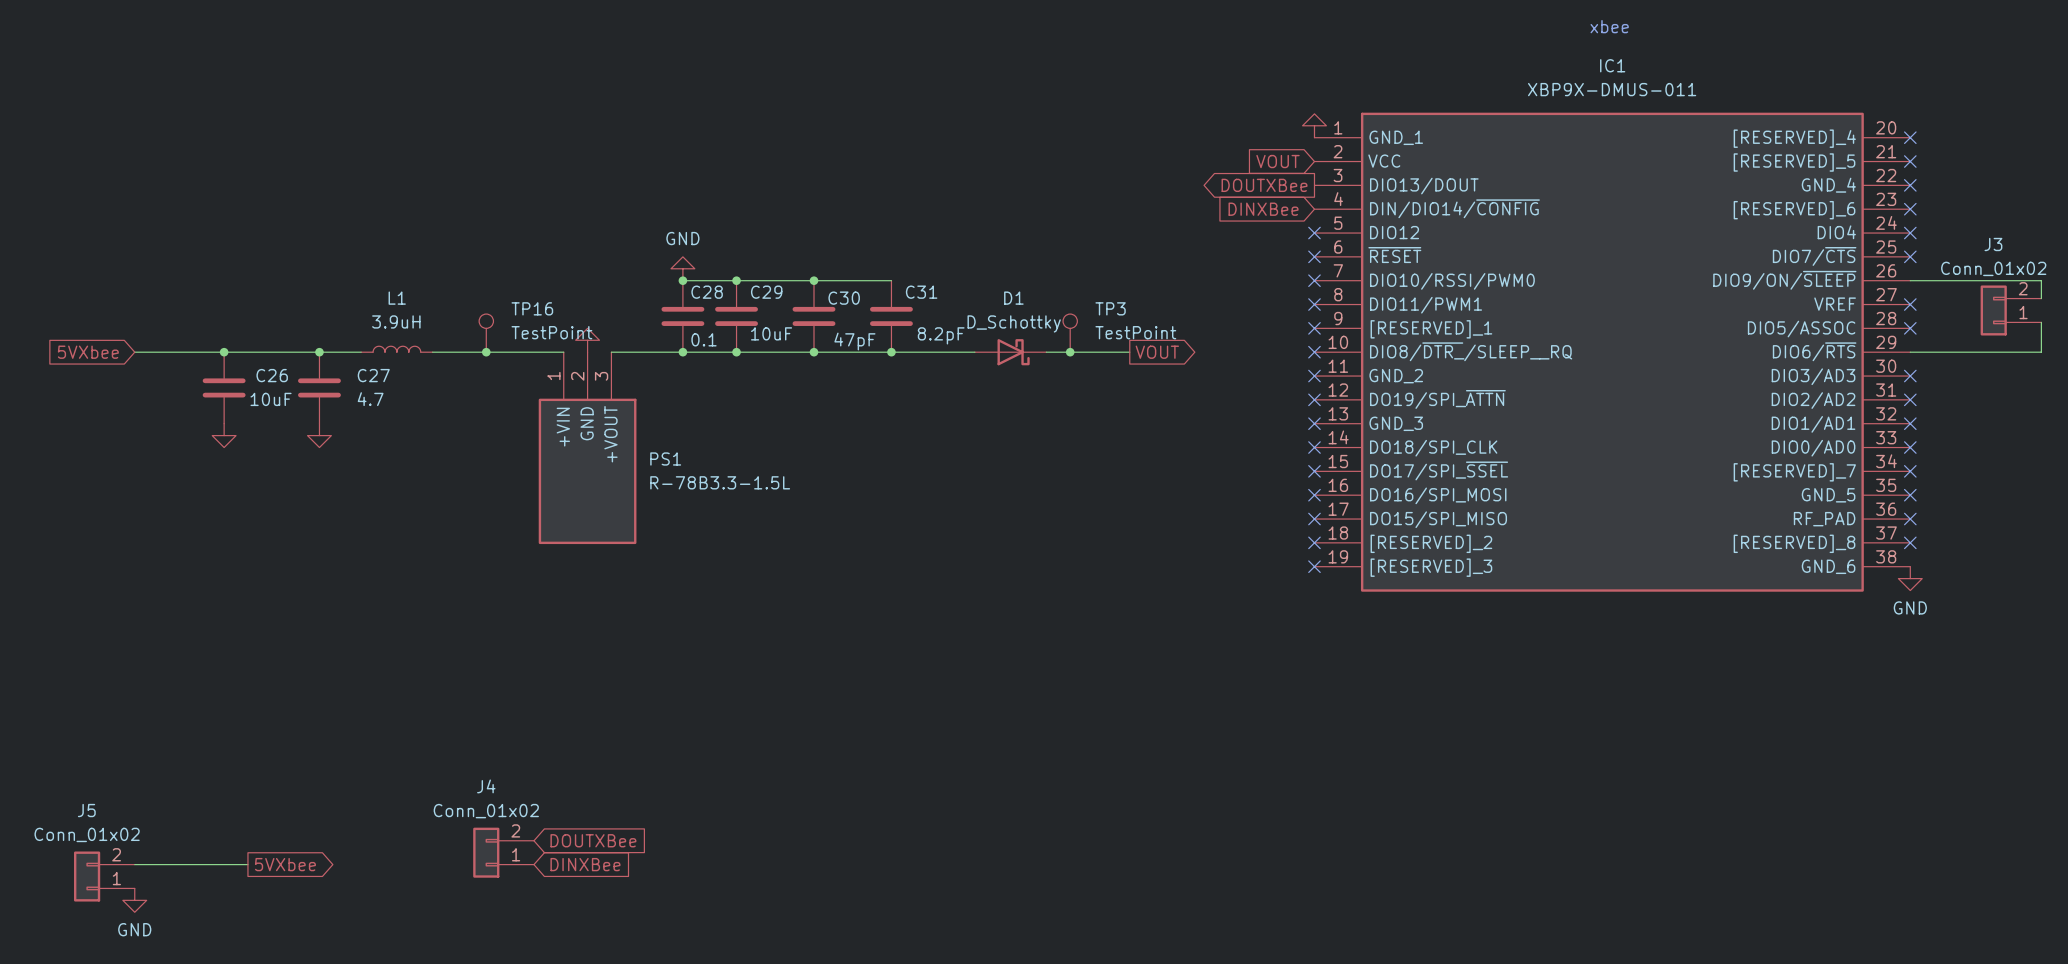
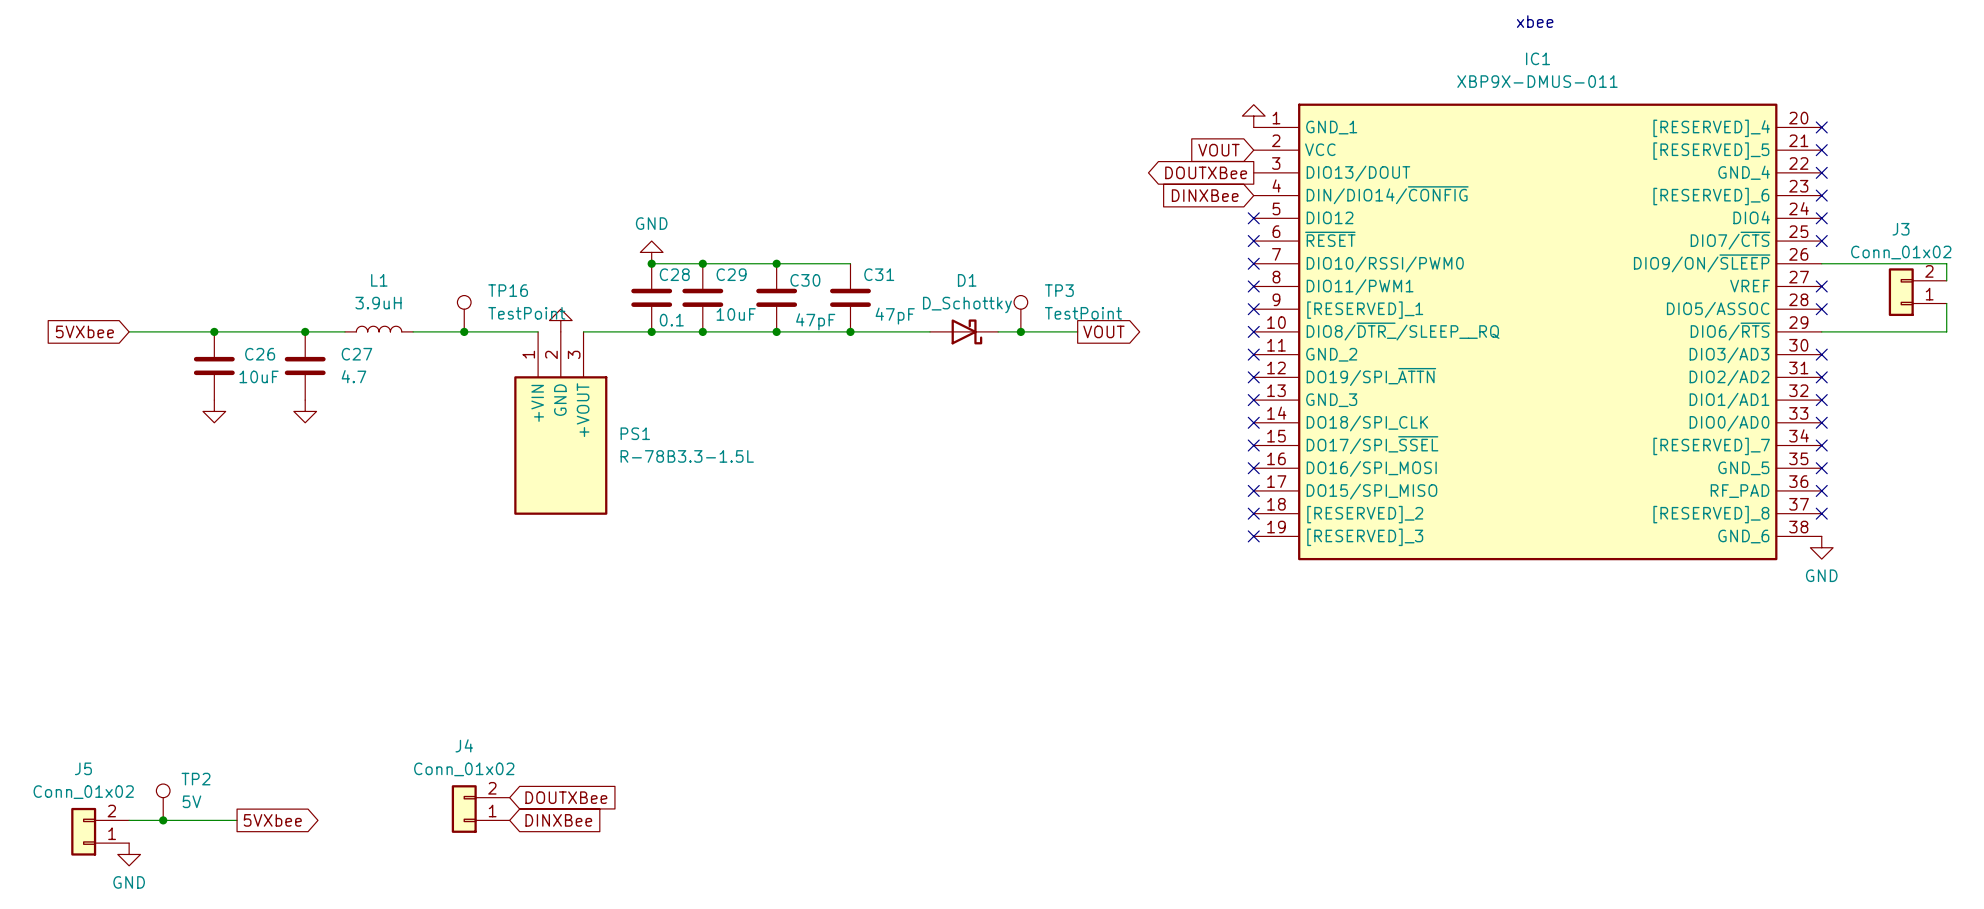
C31 value: 8.2pF (941, 335) -> 47pF (895, 316)
TP2: none -> 5V (163, 802)
junction: none -> (163, 820)

